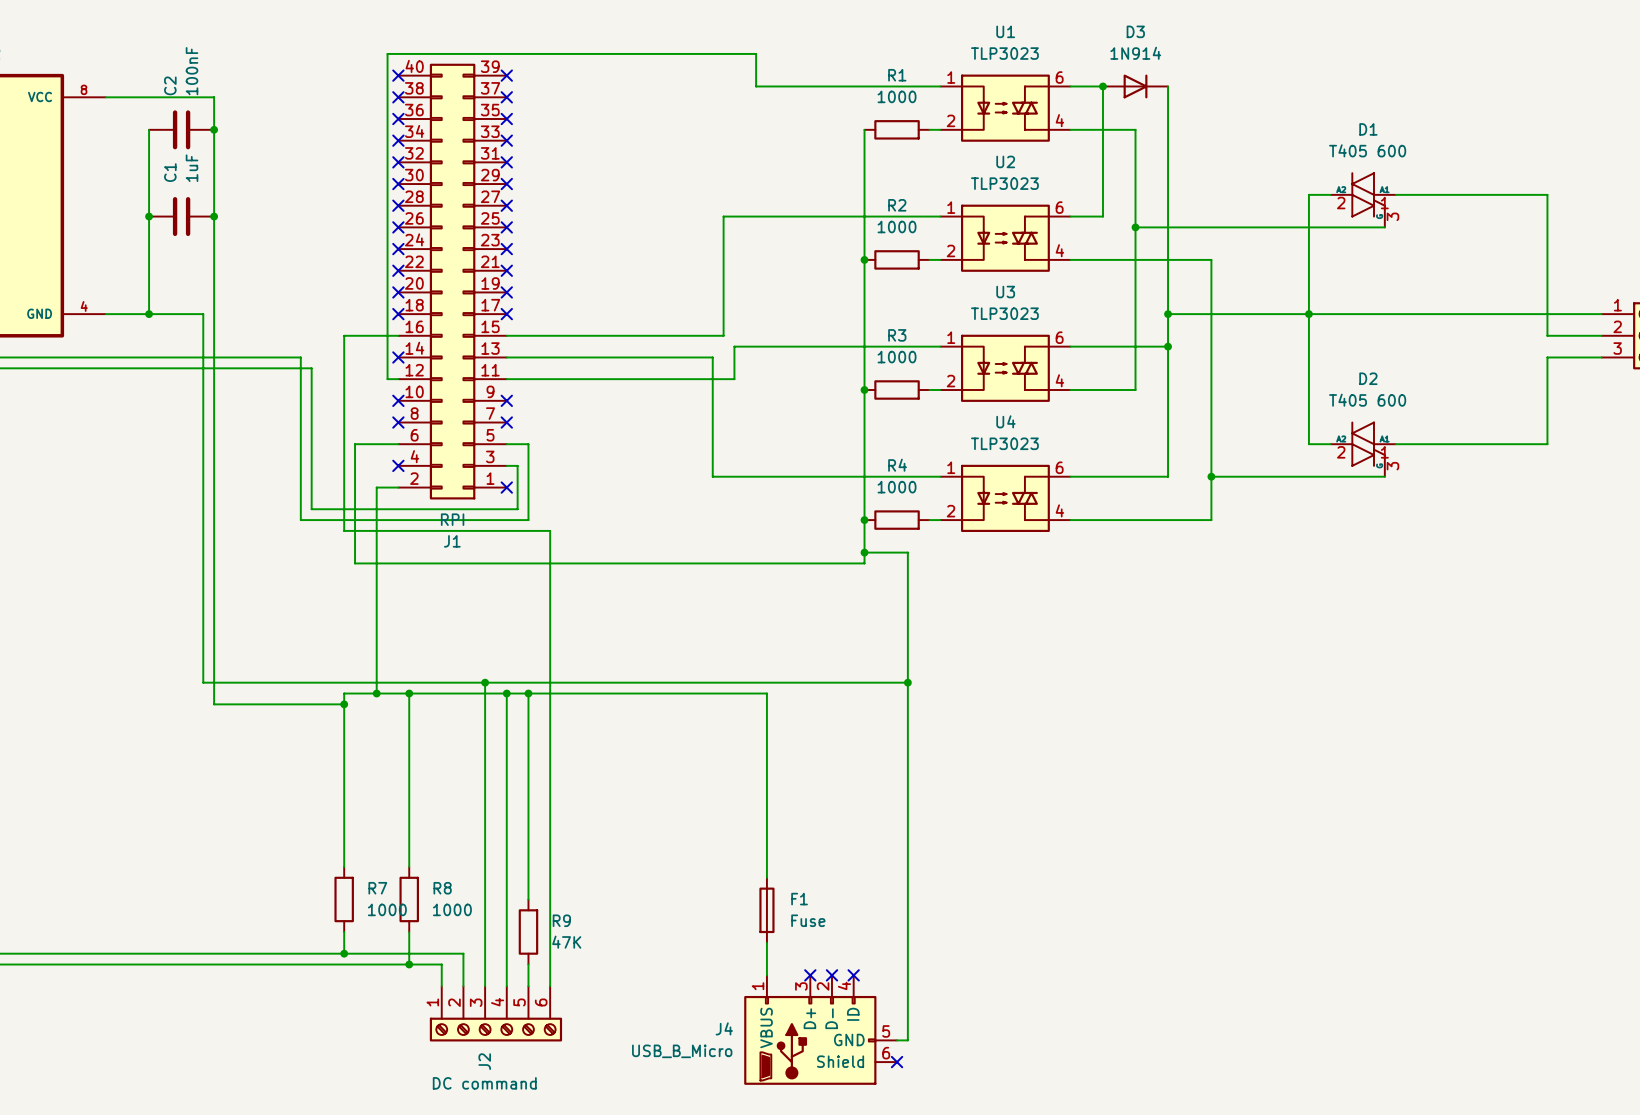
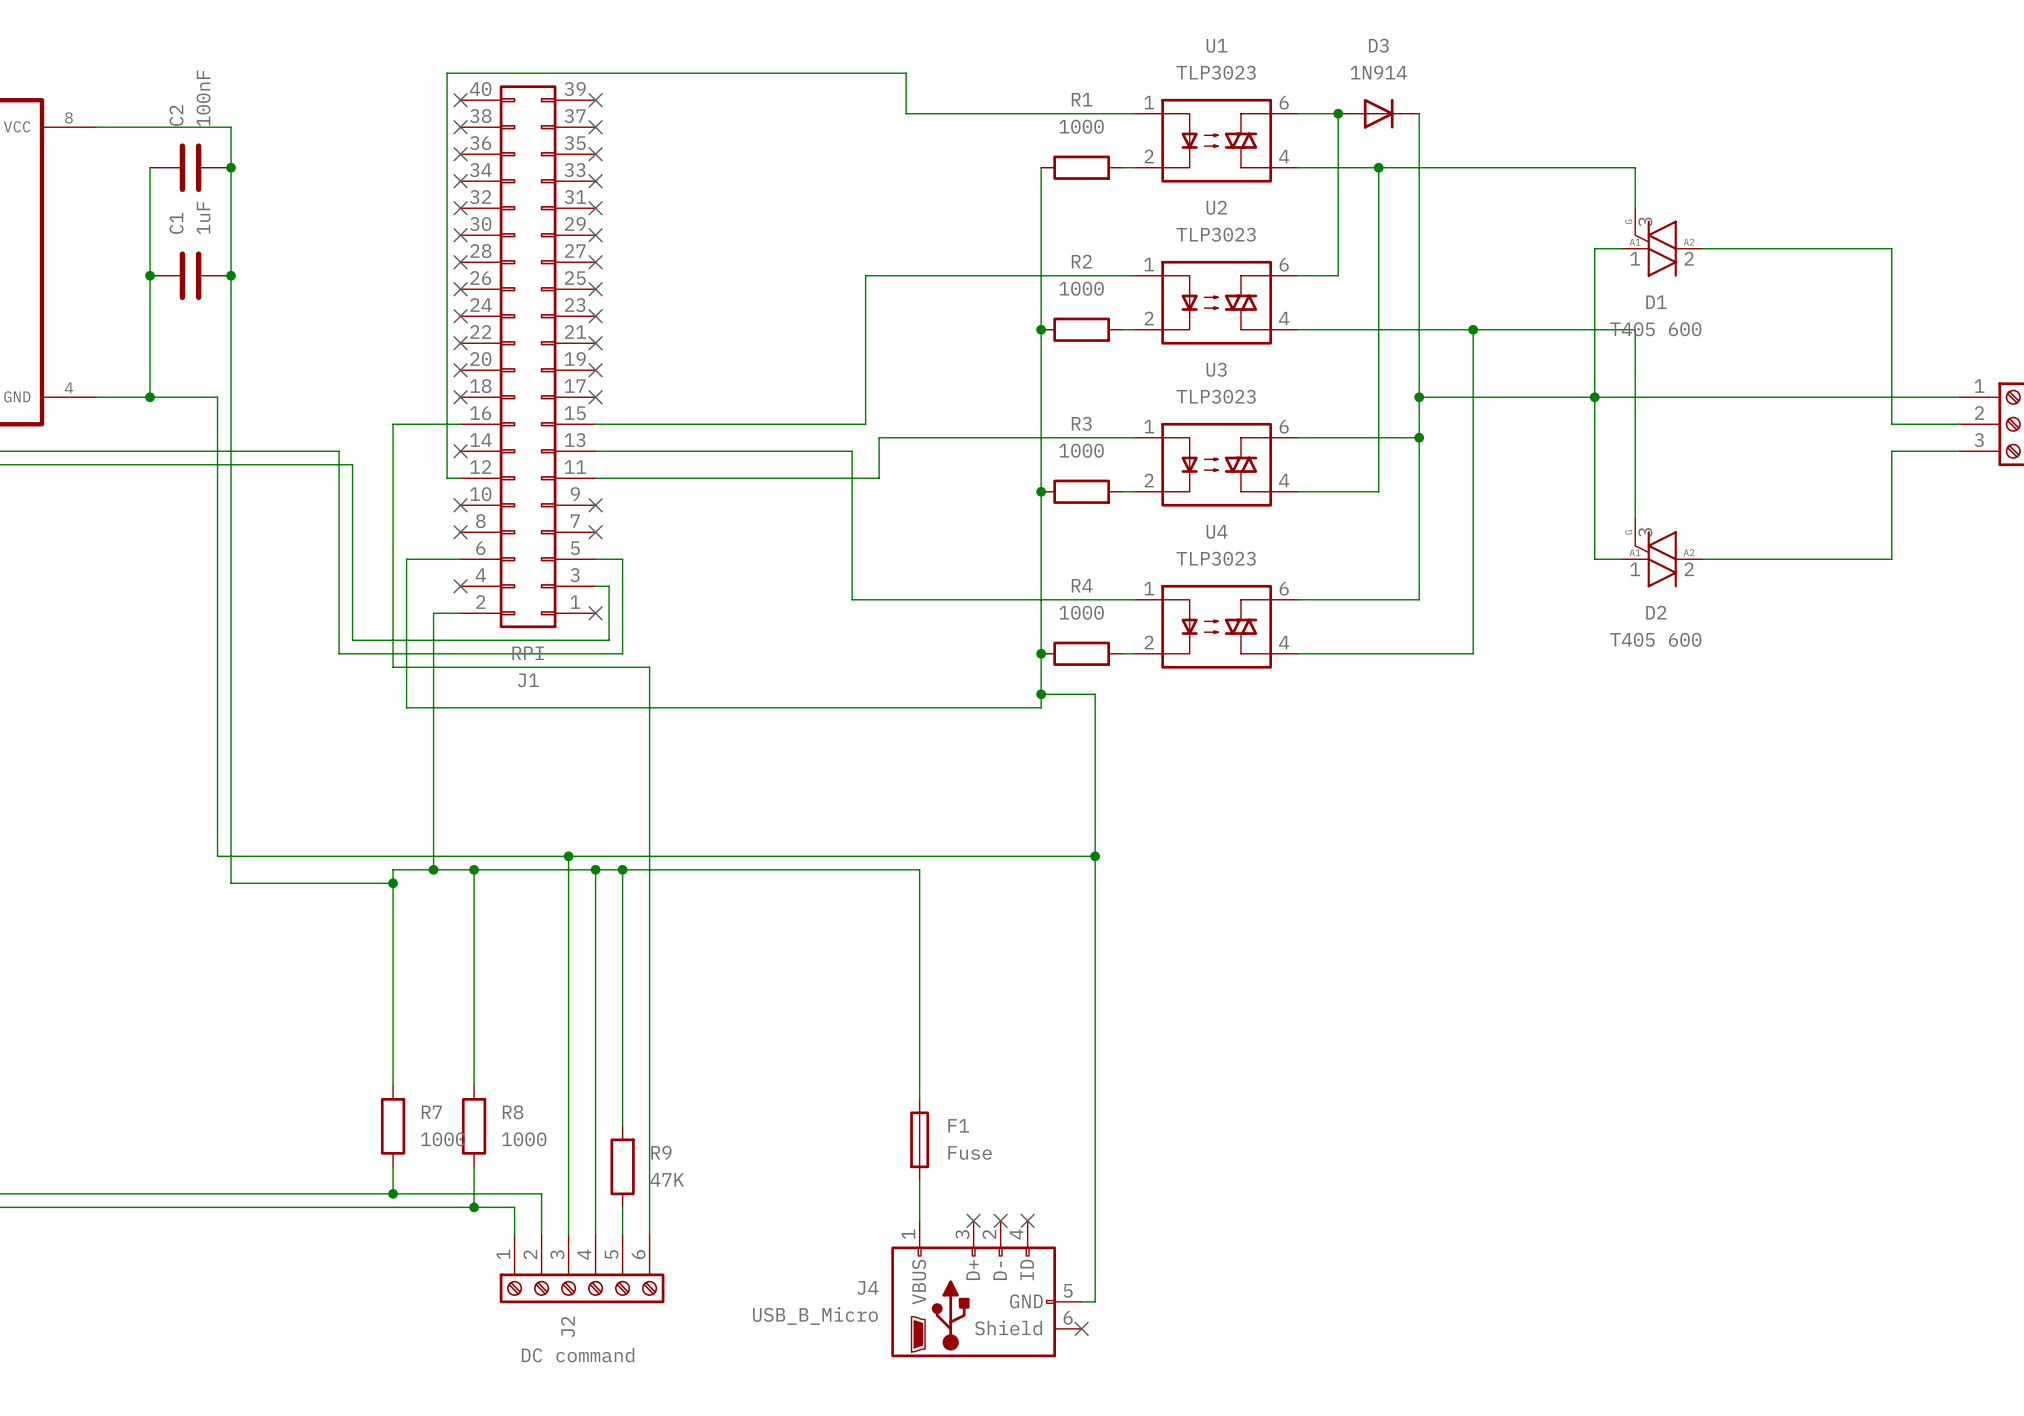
wire: none -> (1378, 167) (1635, 167) (1635, 208)
junction: none -> (1378, 167)
D1 name position: D1 (1368, 129) -> D1 (1656, 302)
D1 value position: T405 600 (1367, 150) -> T405 600 (1655, 329)
D1 rotation: 0° (1368, 194) -> 180° (1656, 248)
wire: (1135, 227) (1384, 227) -> none
junction: (1135, 227) -> none
wire: none -> (1473, 329) (1635, 329) (1635, 518)
junction: none -> (1473, 329)
D2 name position: D2 (1368, 378) -> D2 (1656, 612)
D2 value position: T405 600 (1367, 400) -> T405 600 (1655, 639)
D2 rotation: 0° (1368, 444) -> 180° (1656, 559)
wire: (1211, 476) (1384, 476) -> none
junction: (1211, 476) -> none

